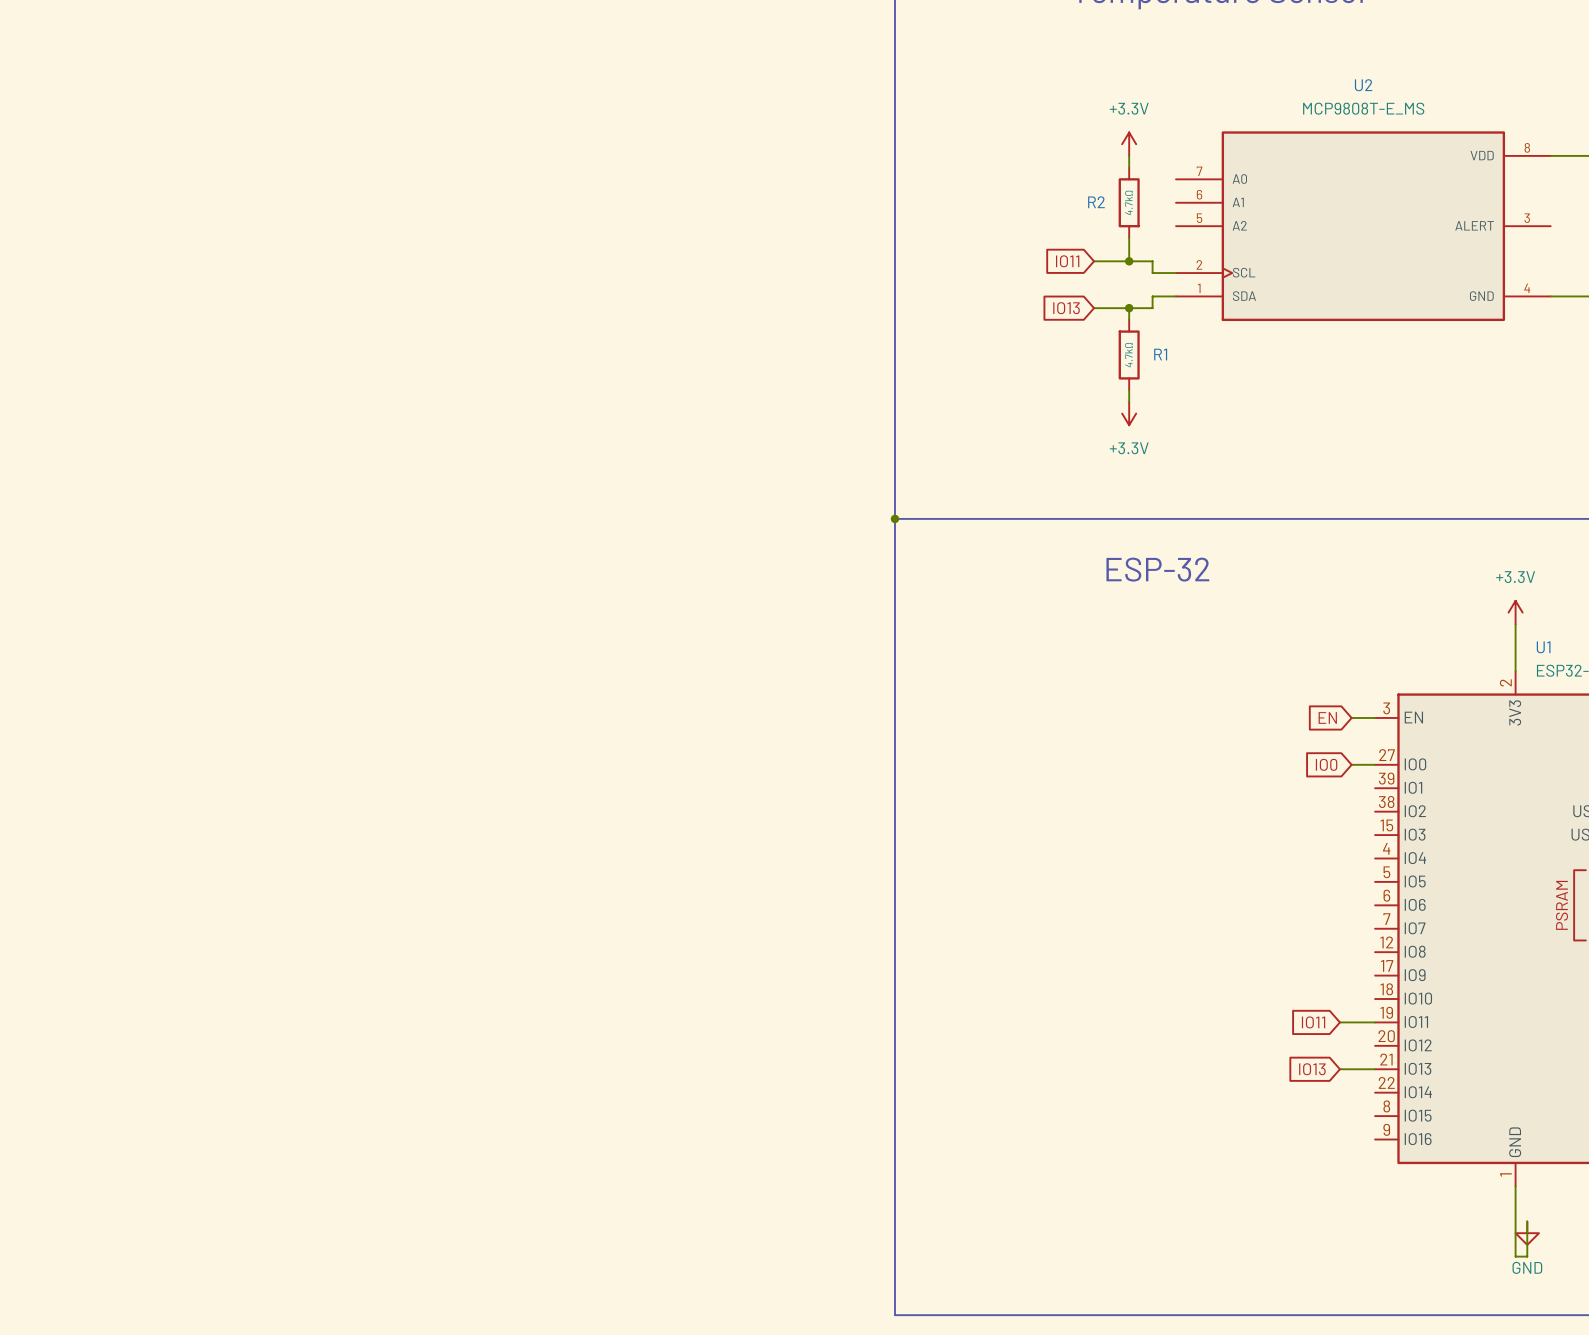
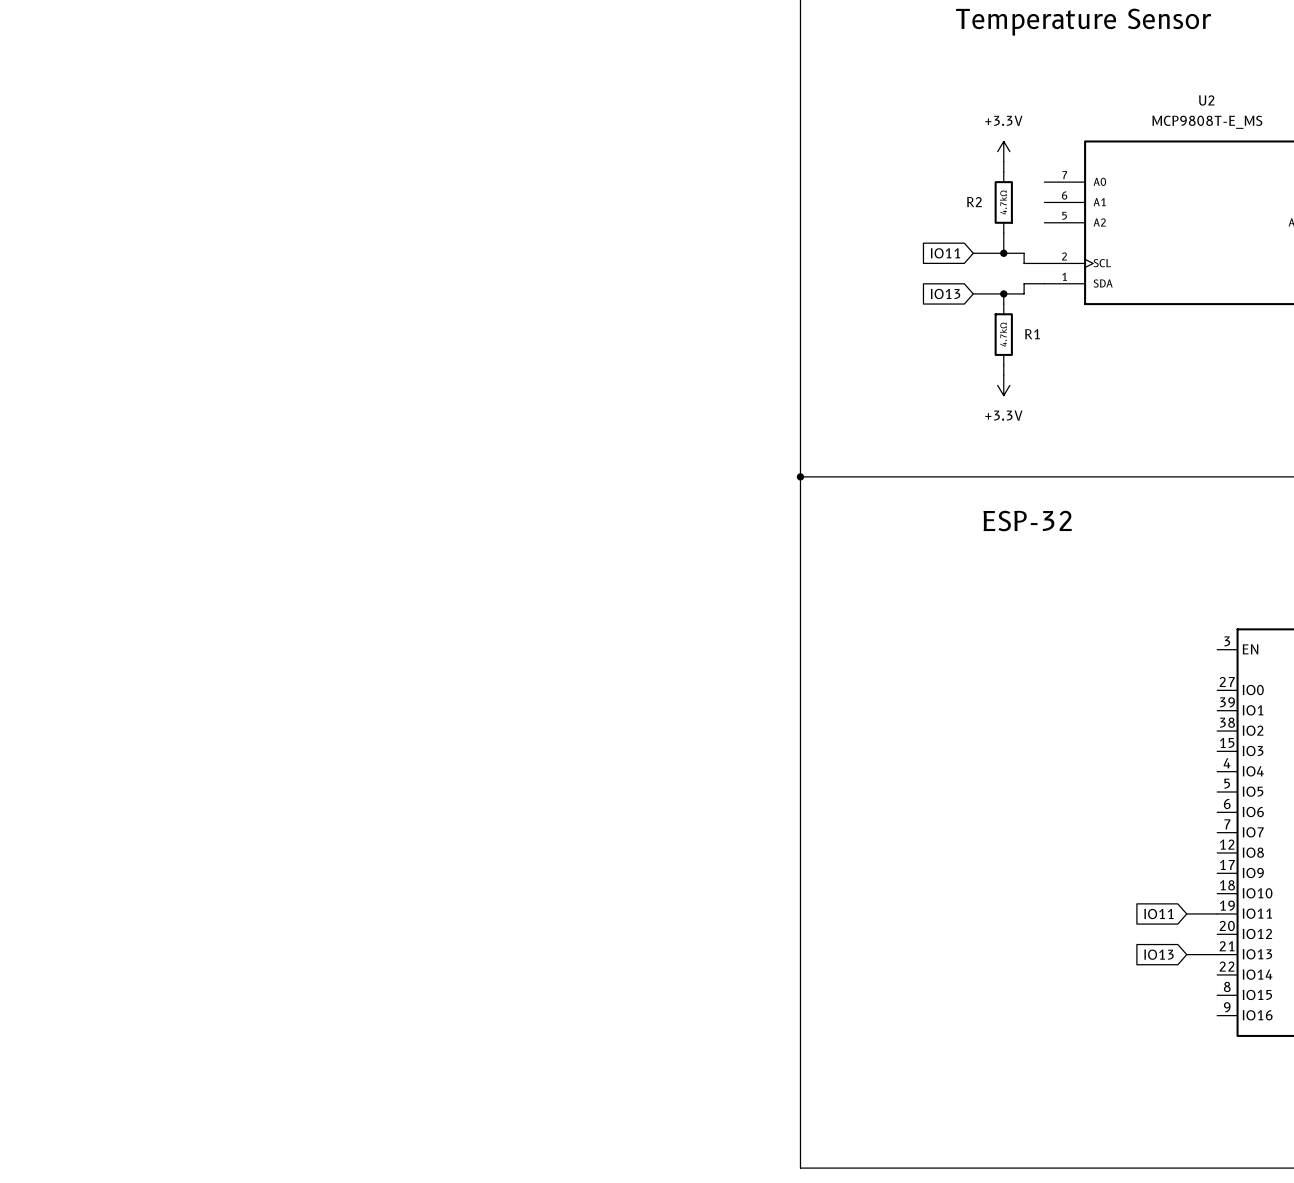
global label: EN (1327, 717) -> none
wire: (1351, 717) (1375, 717) -> none
global label: IO0 (1326, 764) -> none
wire: (1351, 764) (1375, 764) -> none

